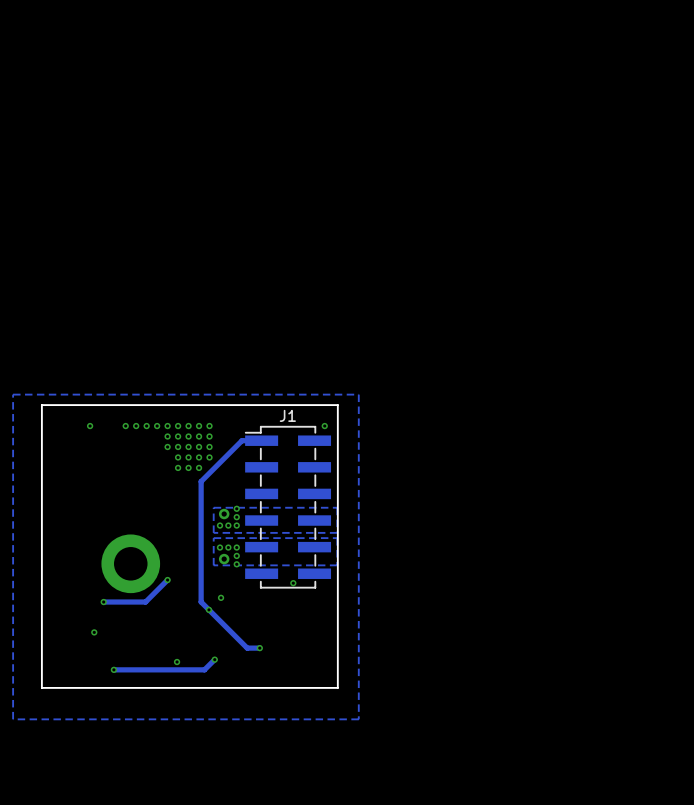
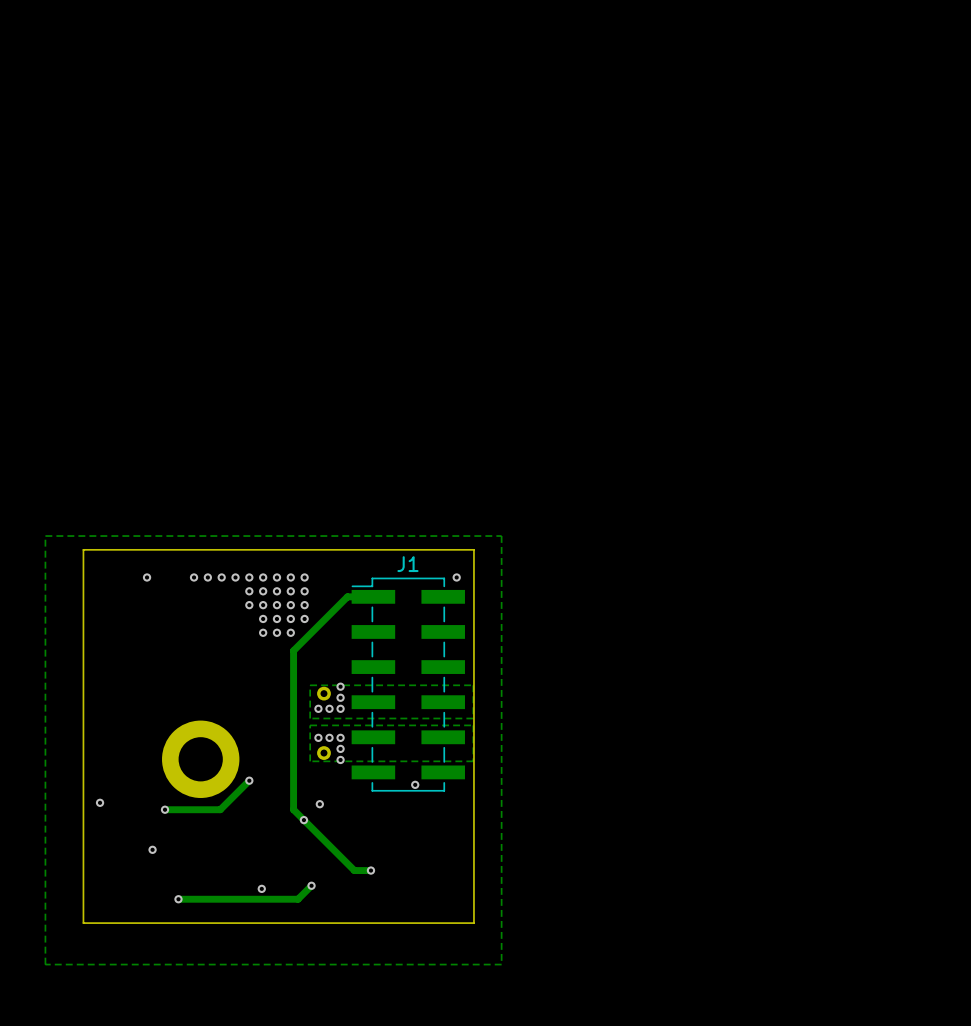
via: none -> (100, 802)

